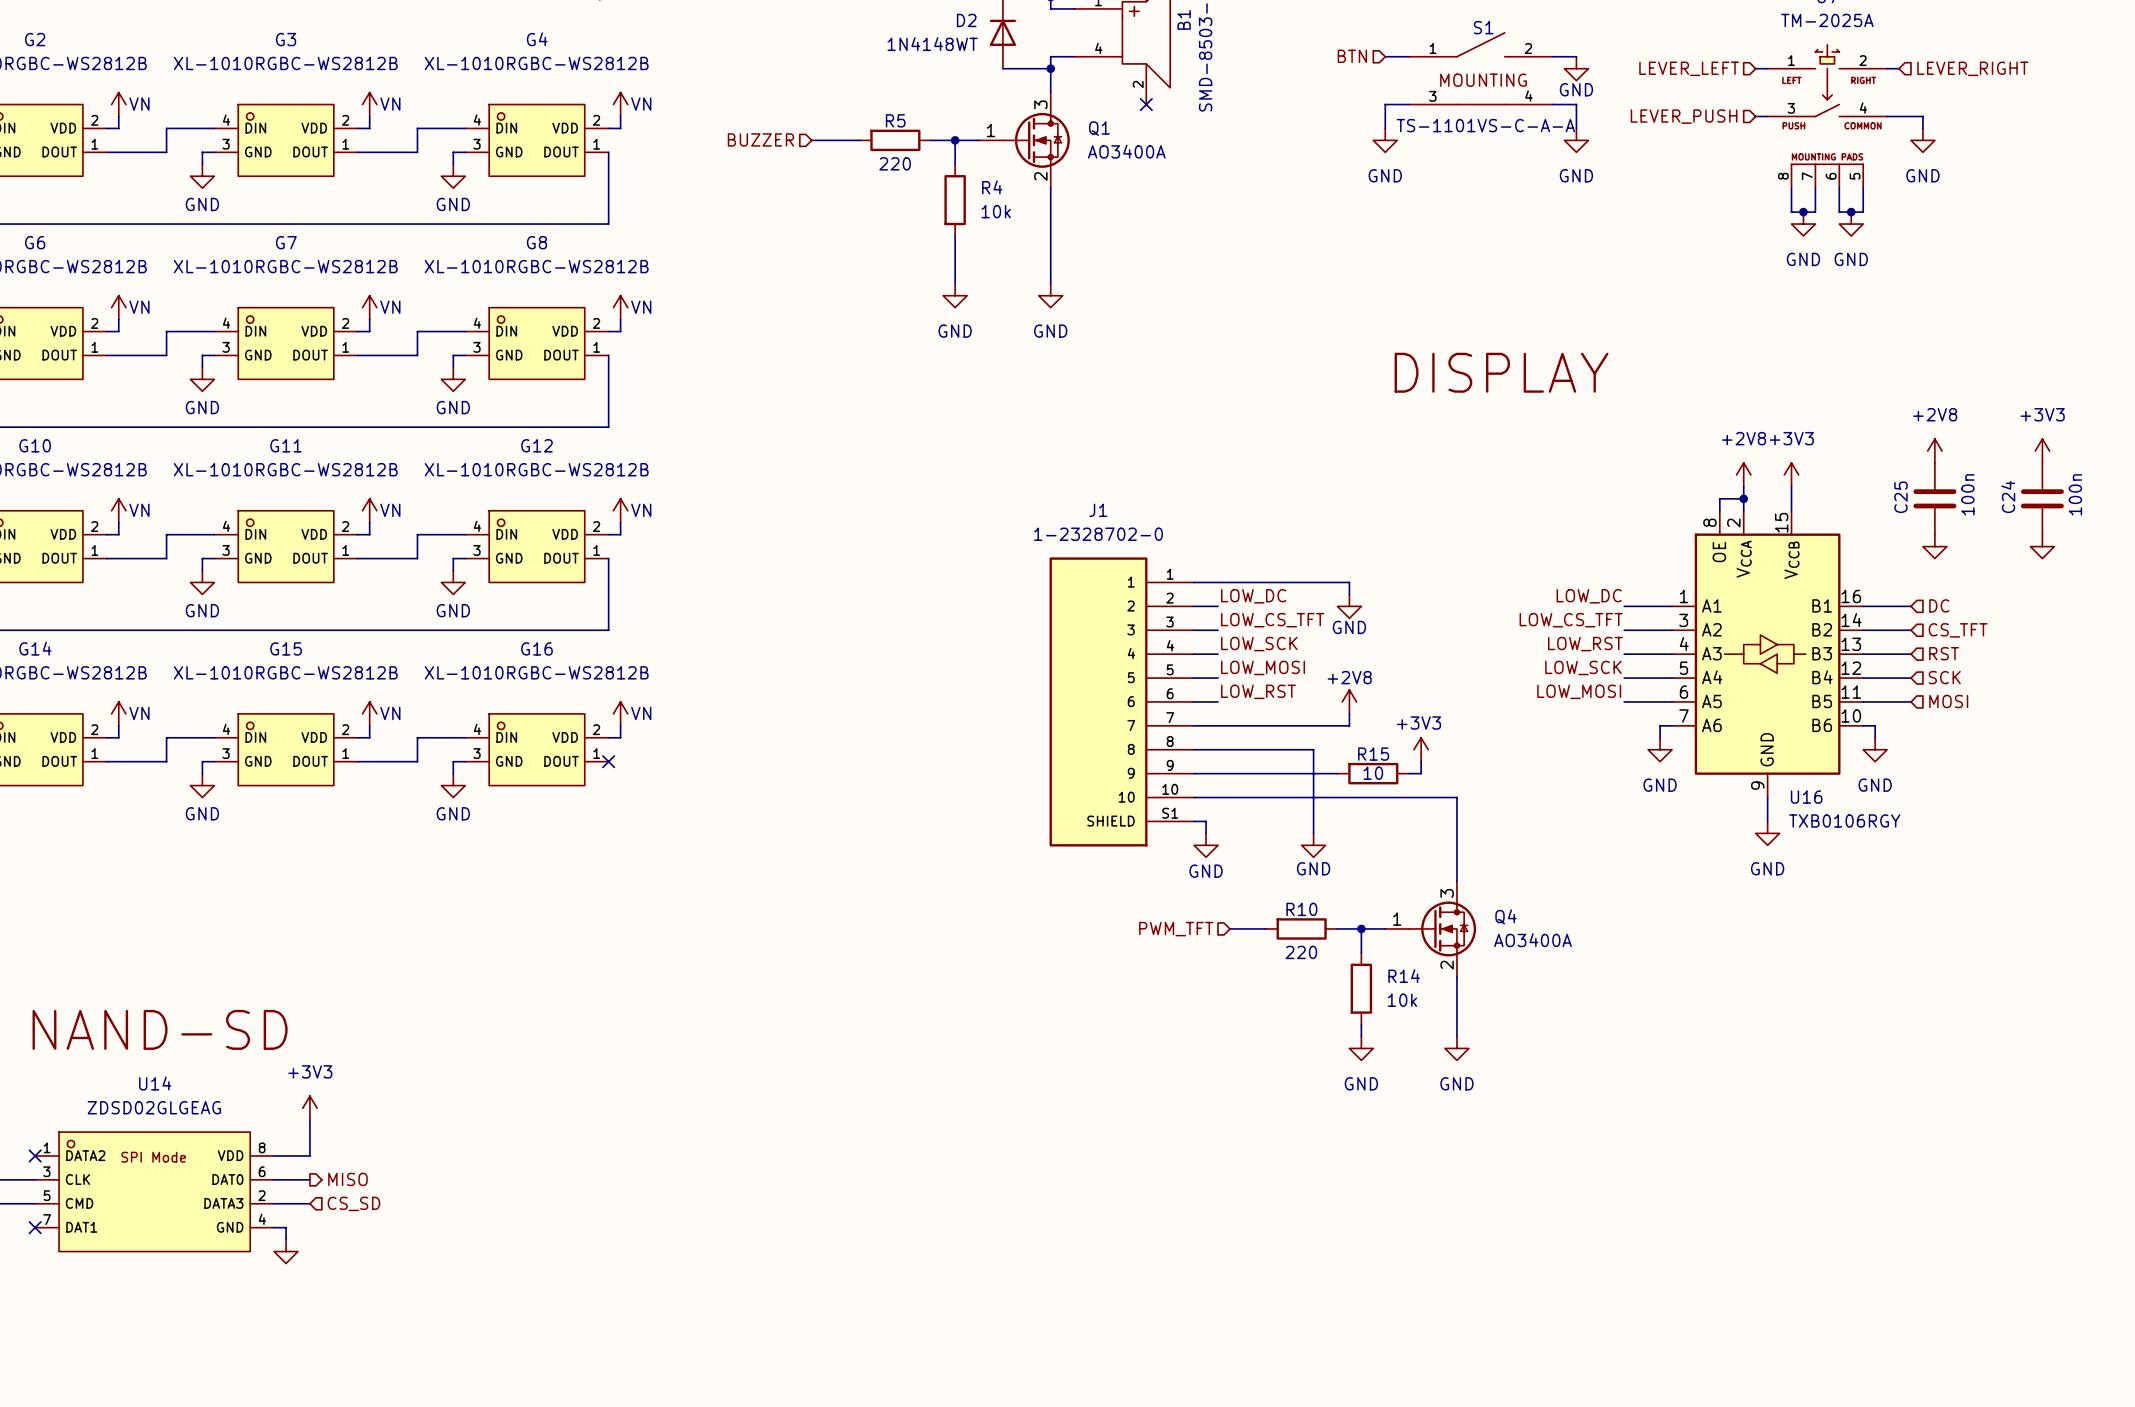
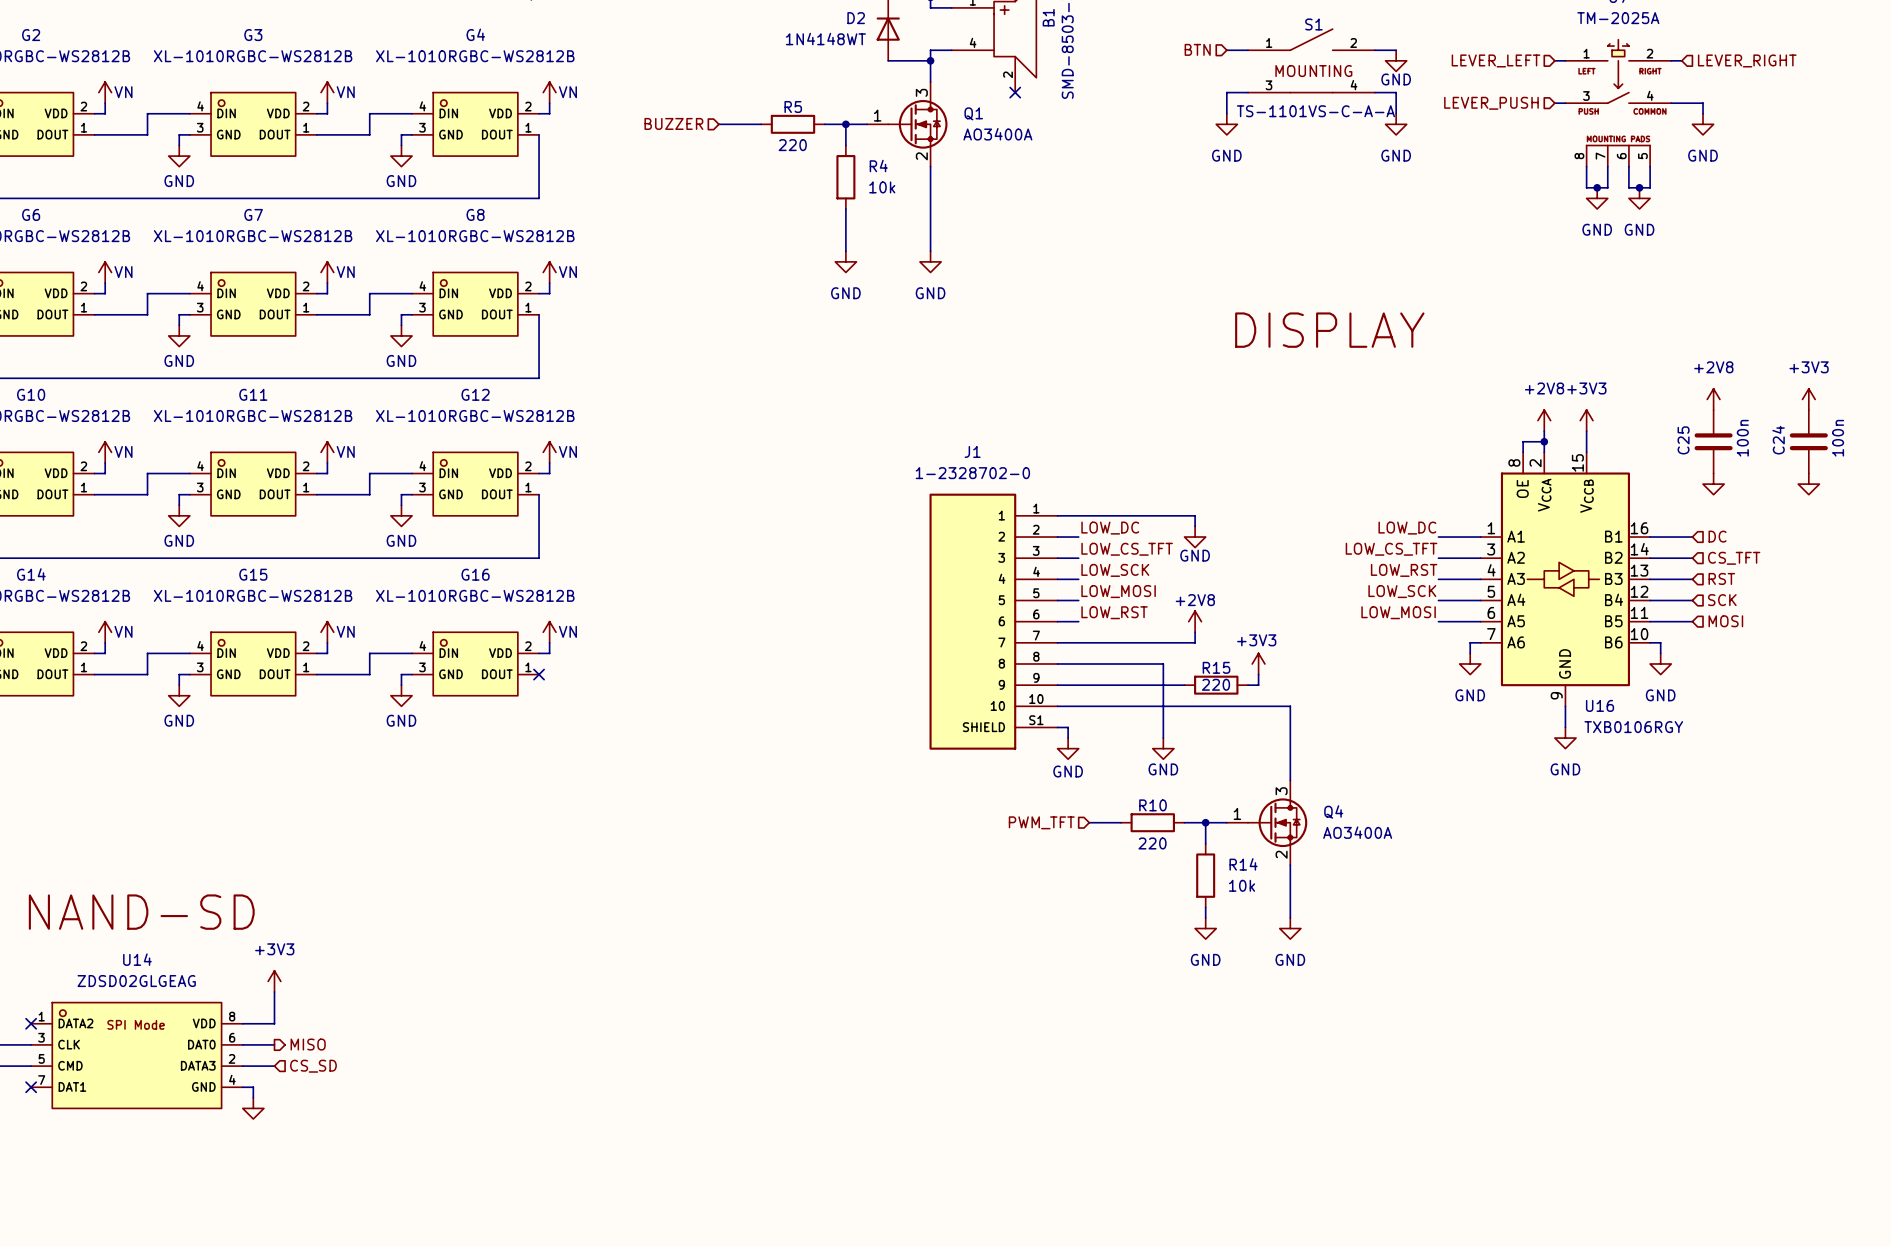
R15 value: 10 (1373, 773) -> 220 (1216, 684)

